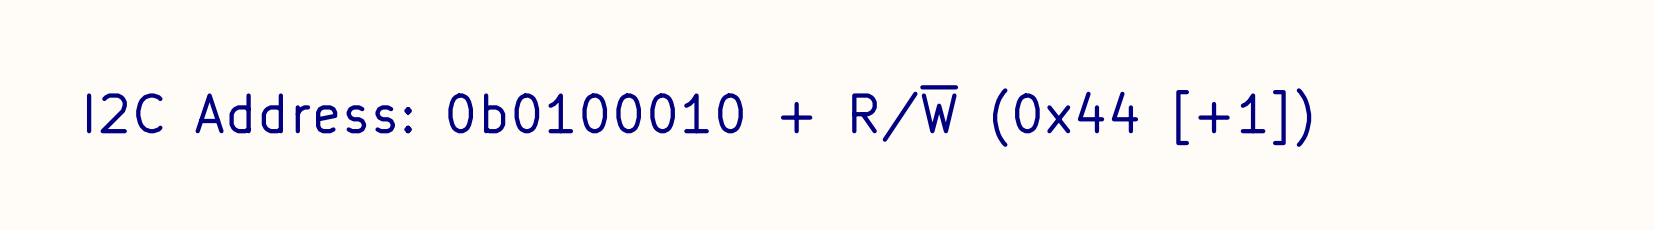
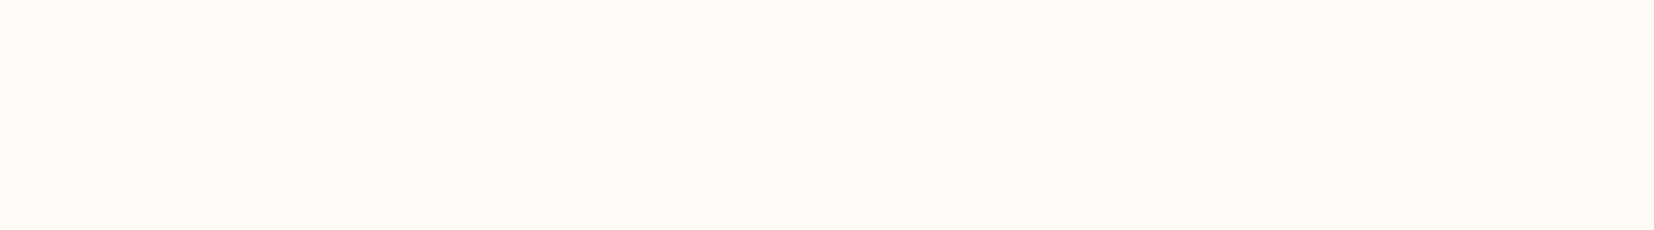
text: I2C Address: 0b0100010 + R/~{W} (0x44 [+1]) (699, 116) -> none

